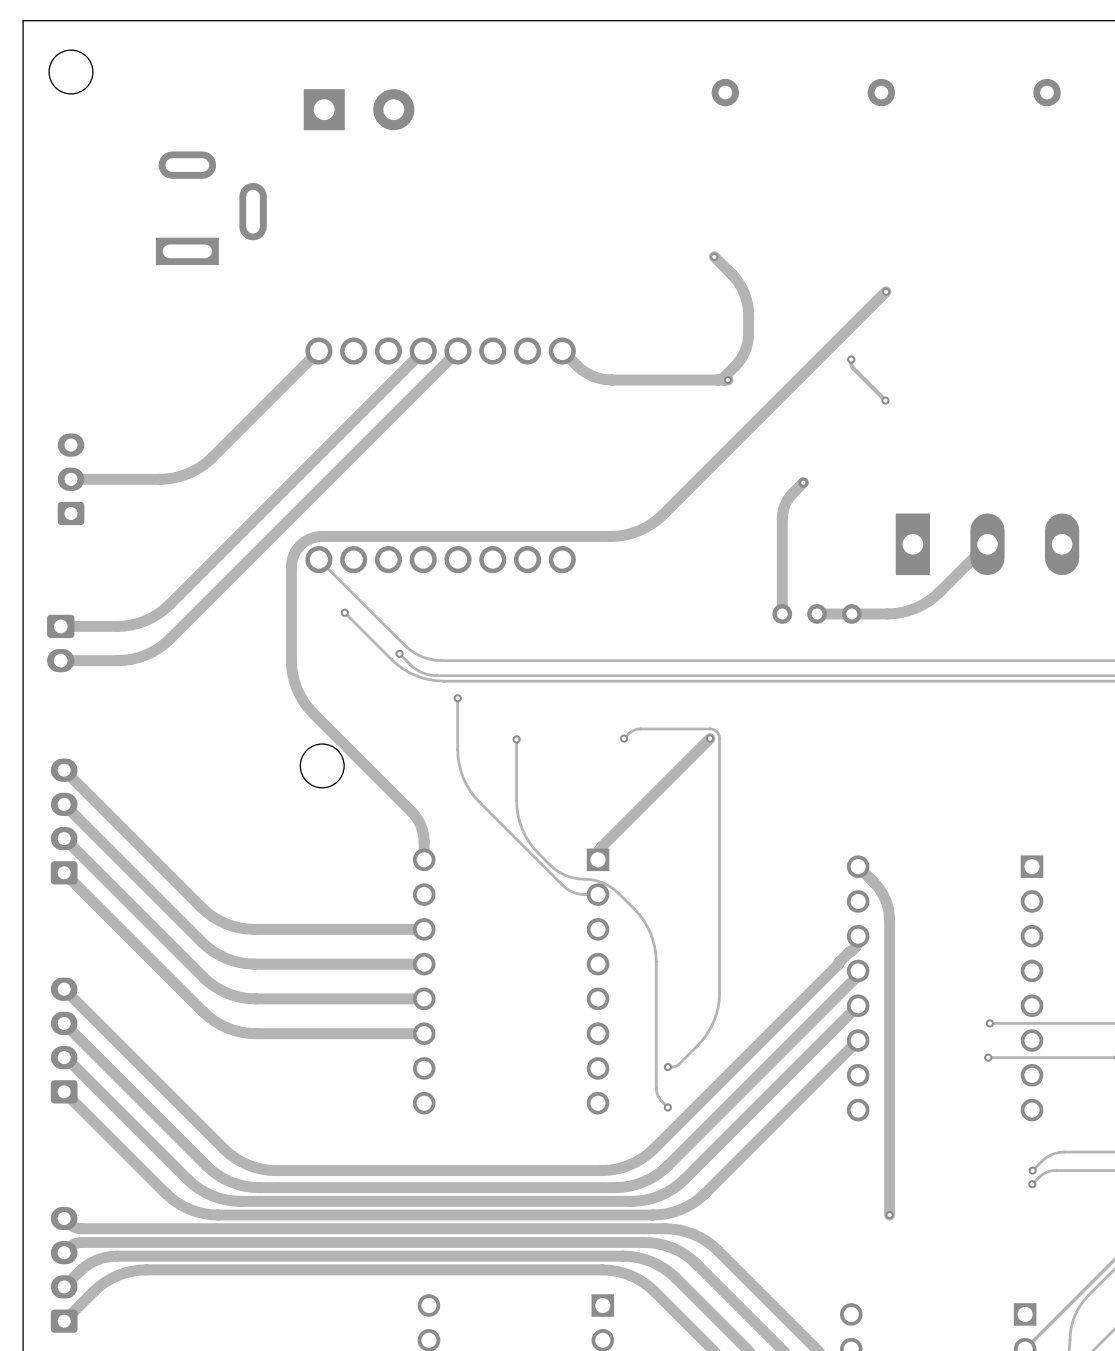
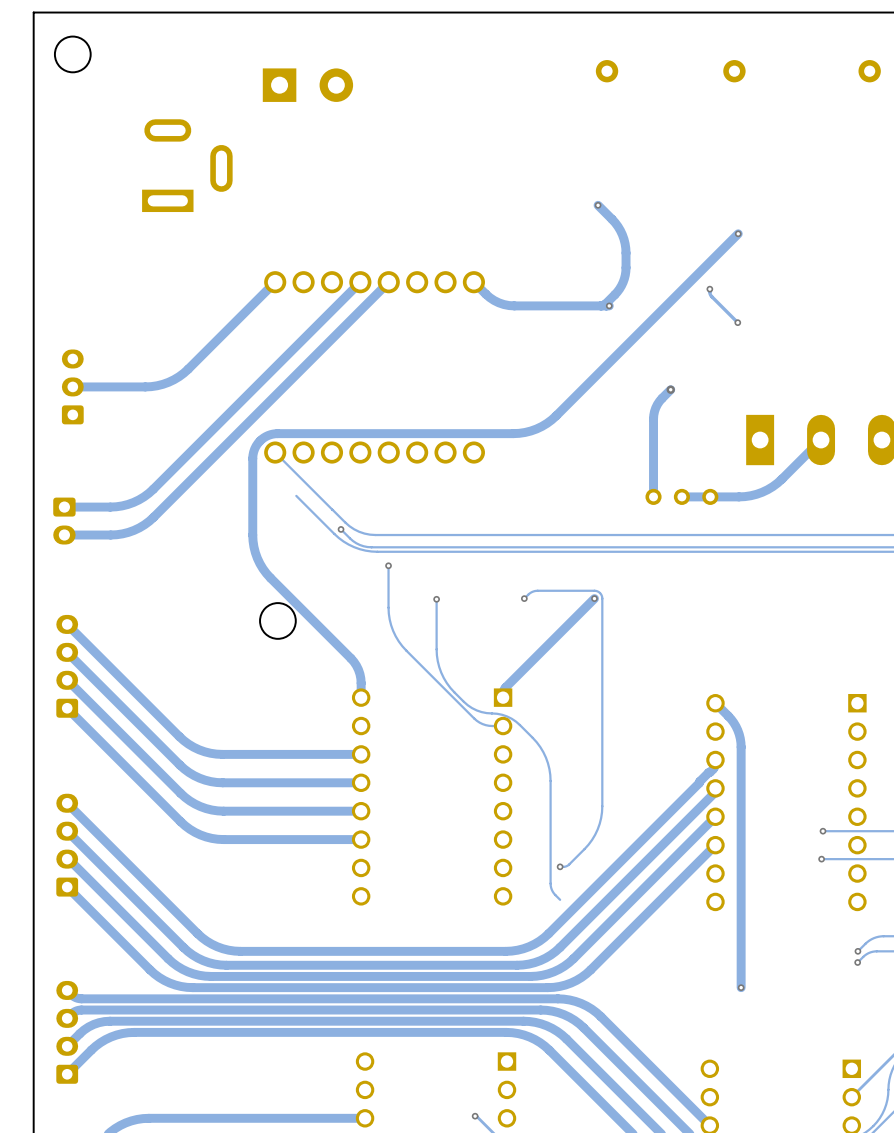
via: (344, 612) -> none
via: (667, 1107) -> none

